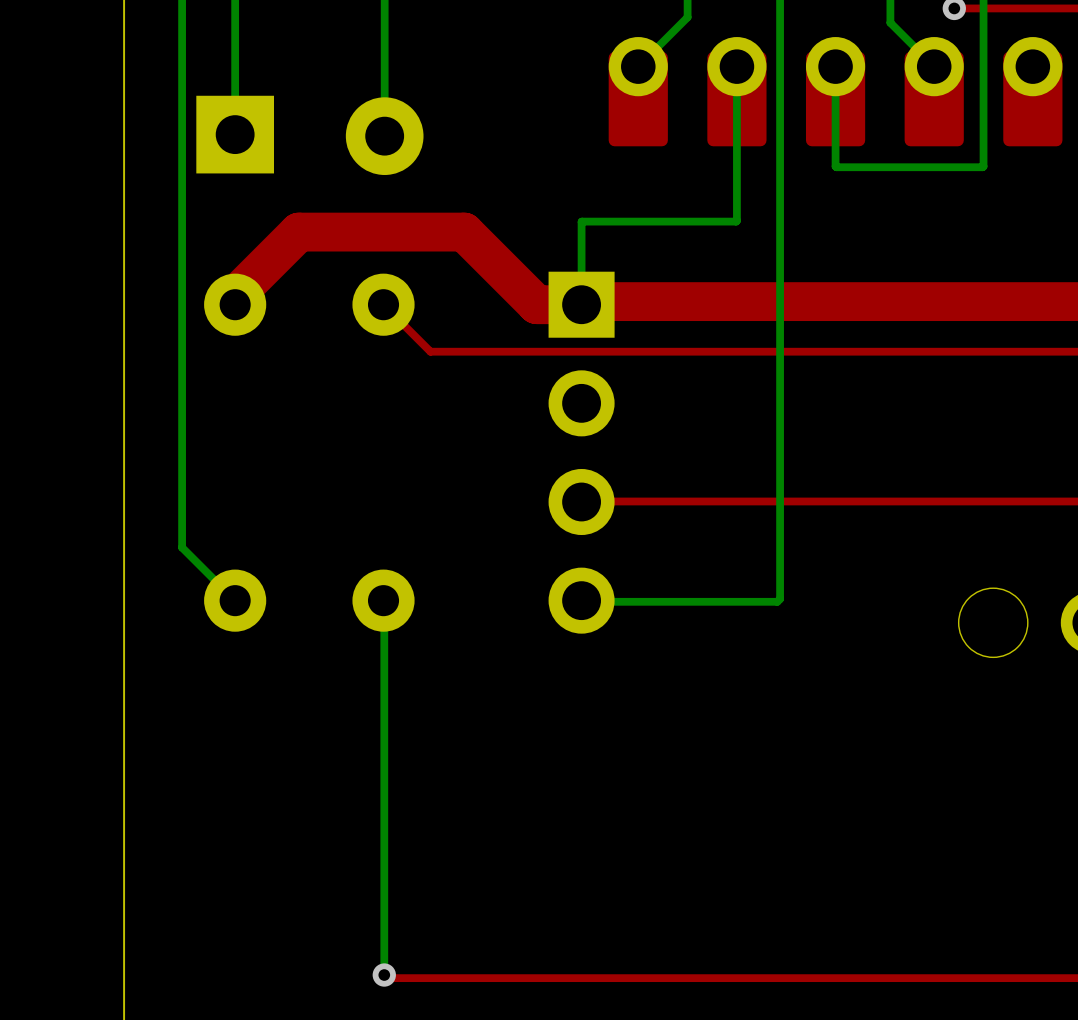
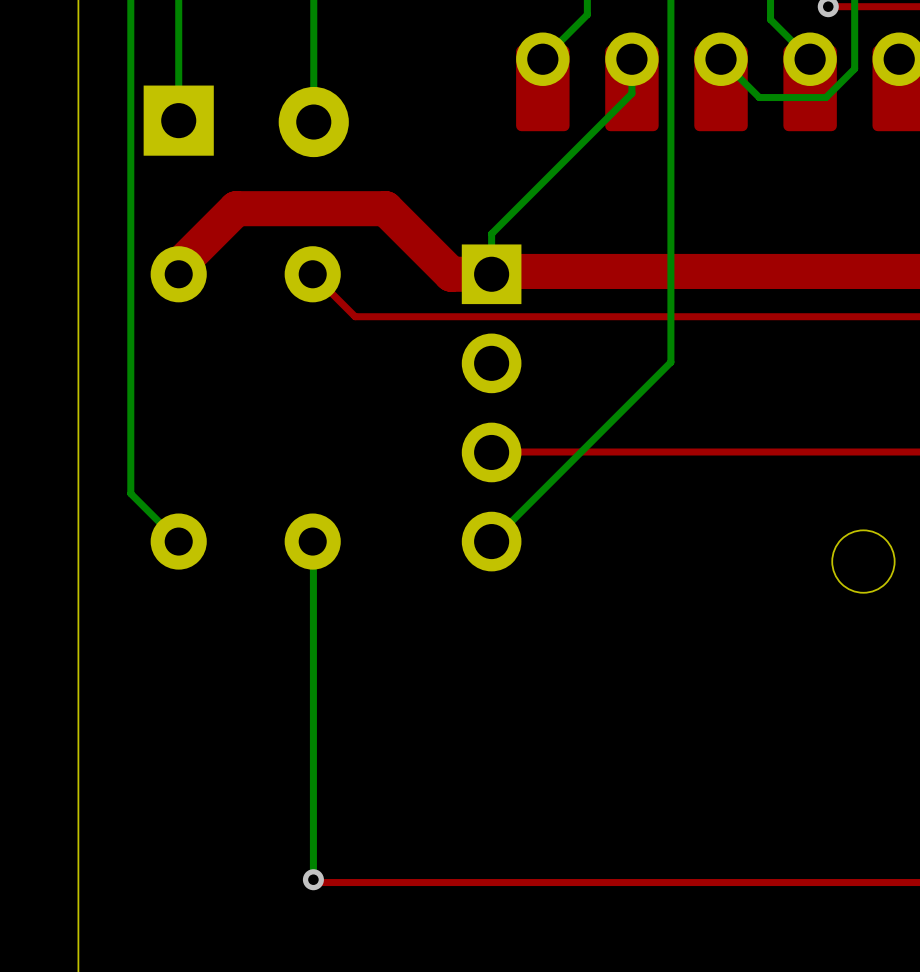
bottom track: (835, 66) (836, 167) (982, 167) (983, 77) -> (721, 59) (759, 97) (826, 97) (854, 68)
bottom track: (736, 104) (736, 221) (581, 221) -> (631, 93) (491, 233)
bottom track: (581, 221) (581, 259) -> none
bottom track: (780, 402) (780, 599) (777, 601) (581, 600) -> (670, 362) (491, 541)

